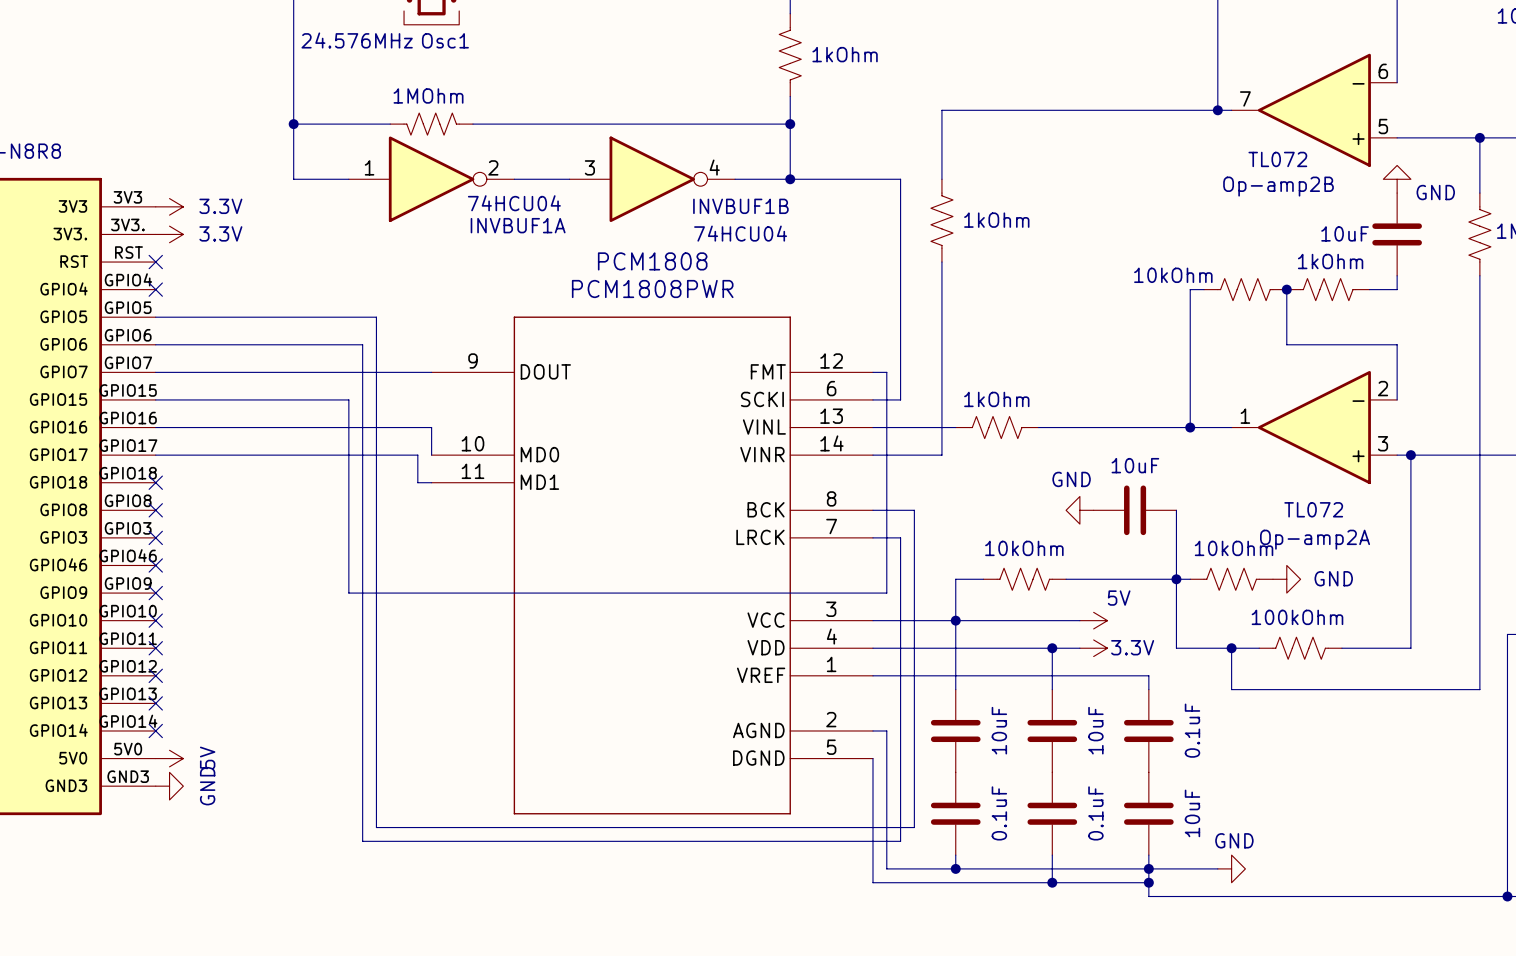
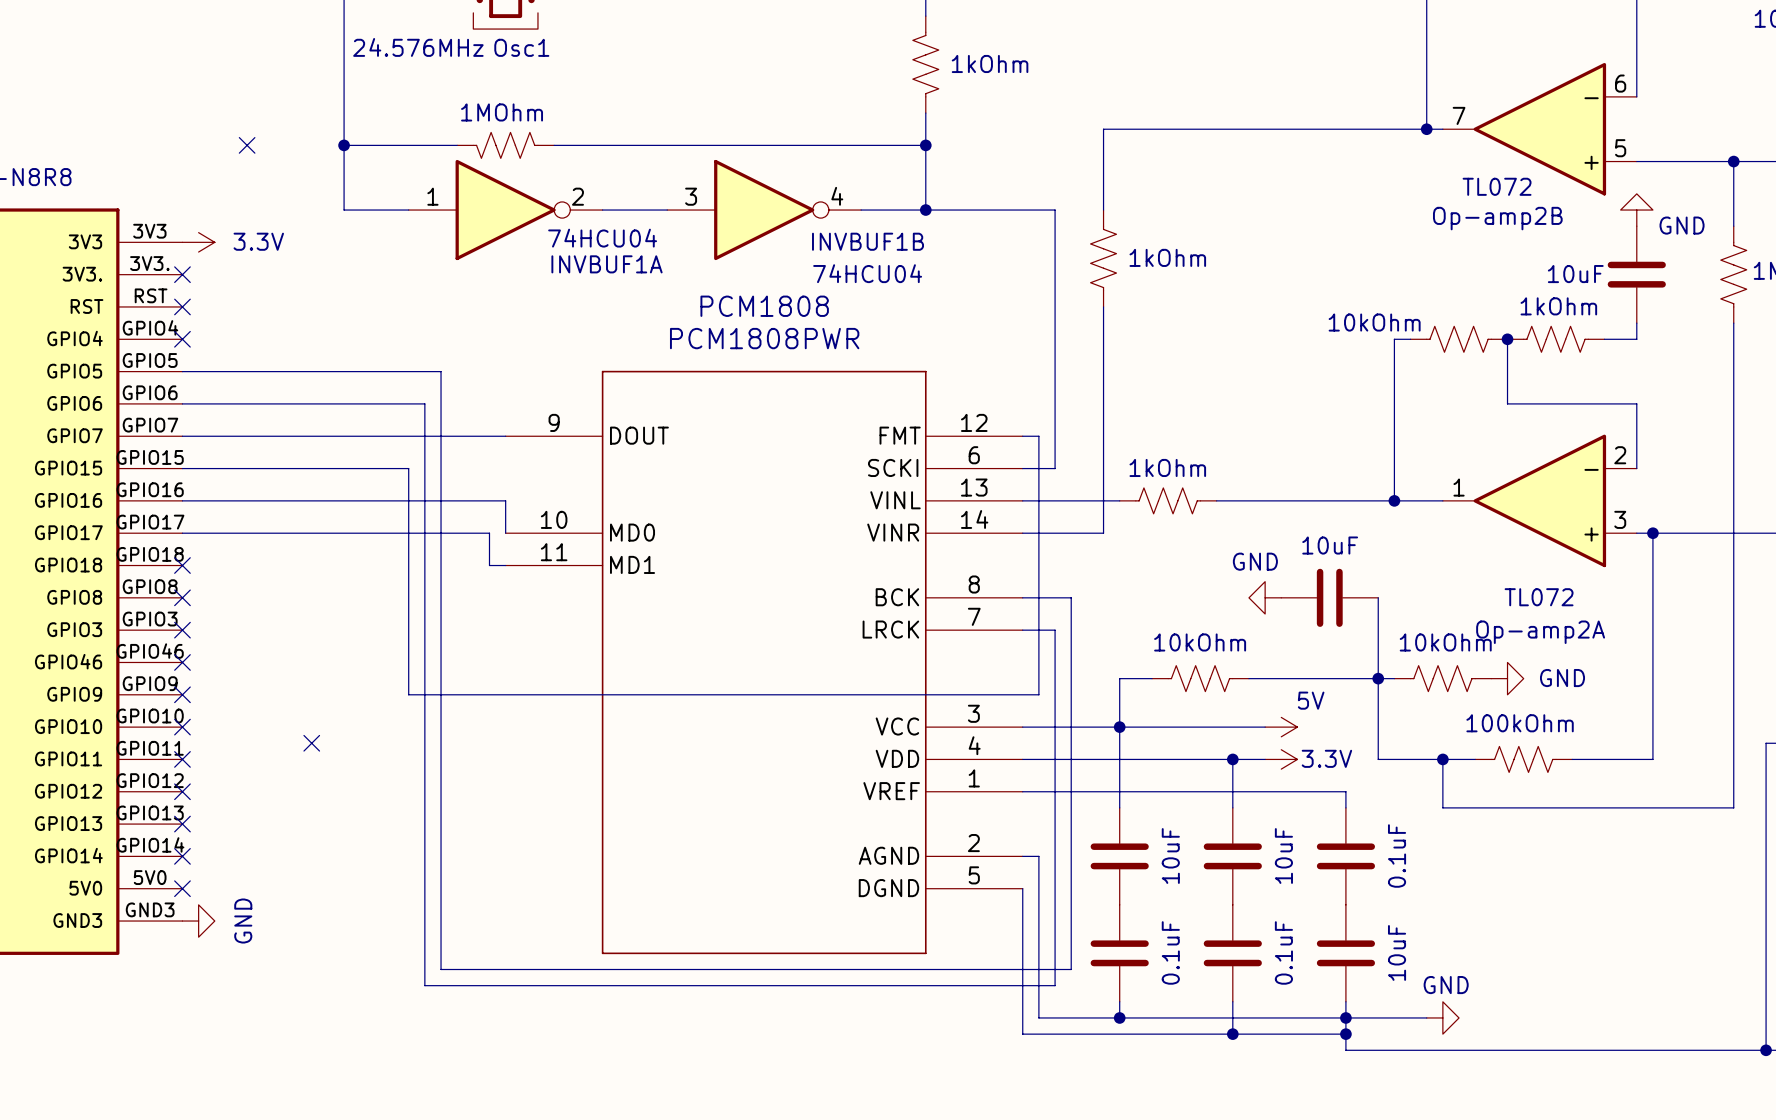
no-connect mark: none -> (247, 145)
no-connect mark: none -> (182, 274)
power symbol: 3.3V (169, 234) -> none
no-connect mark: none -> (311, 743)
no-connect mark: none -> (182, 888)
power symbol: 5V (169, 758) -> none

